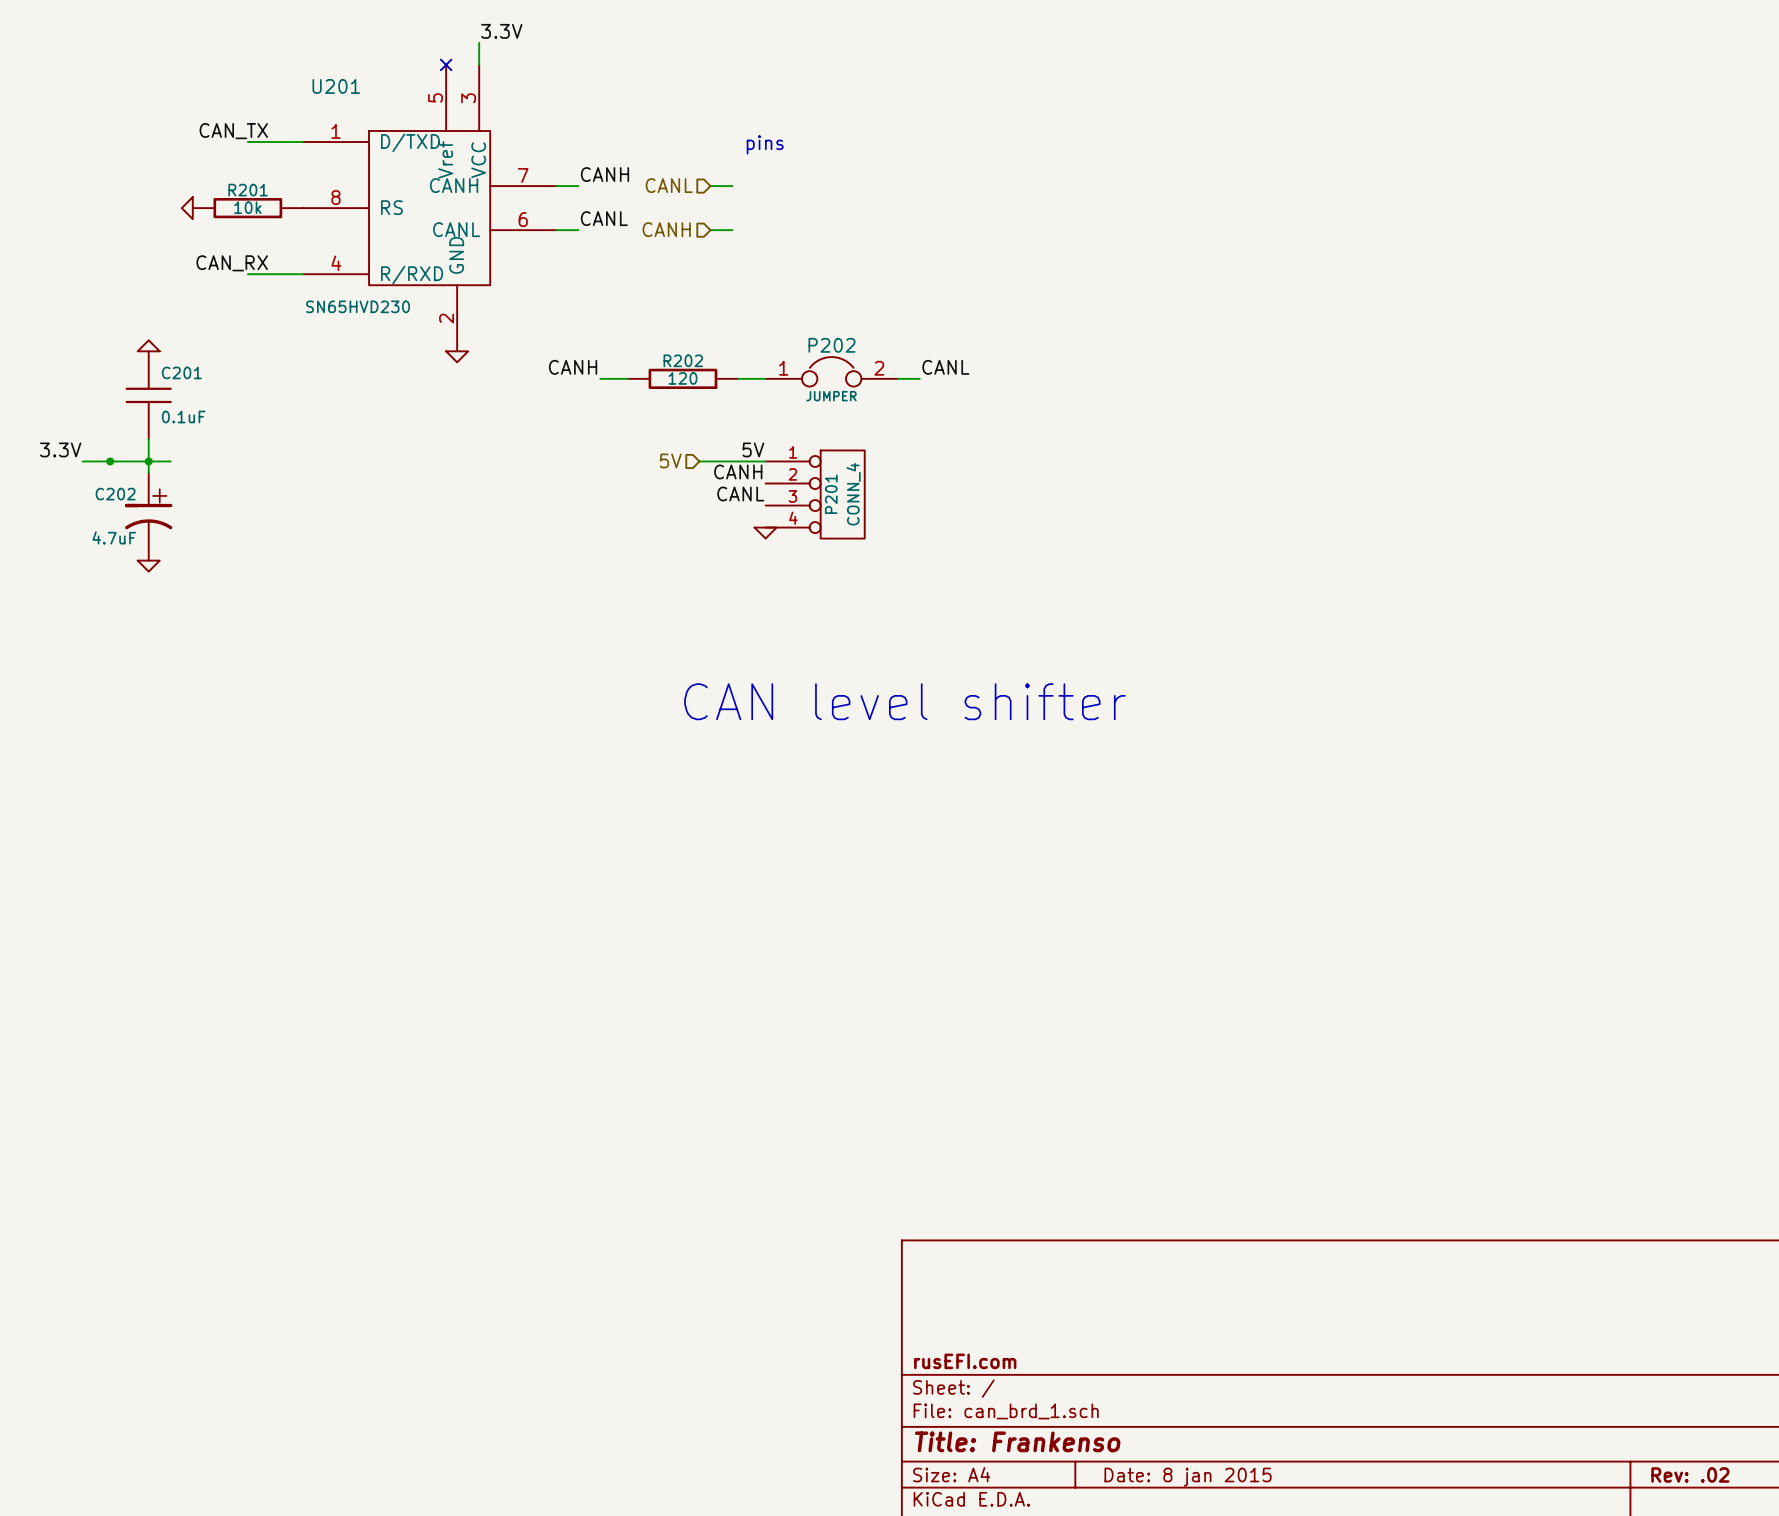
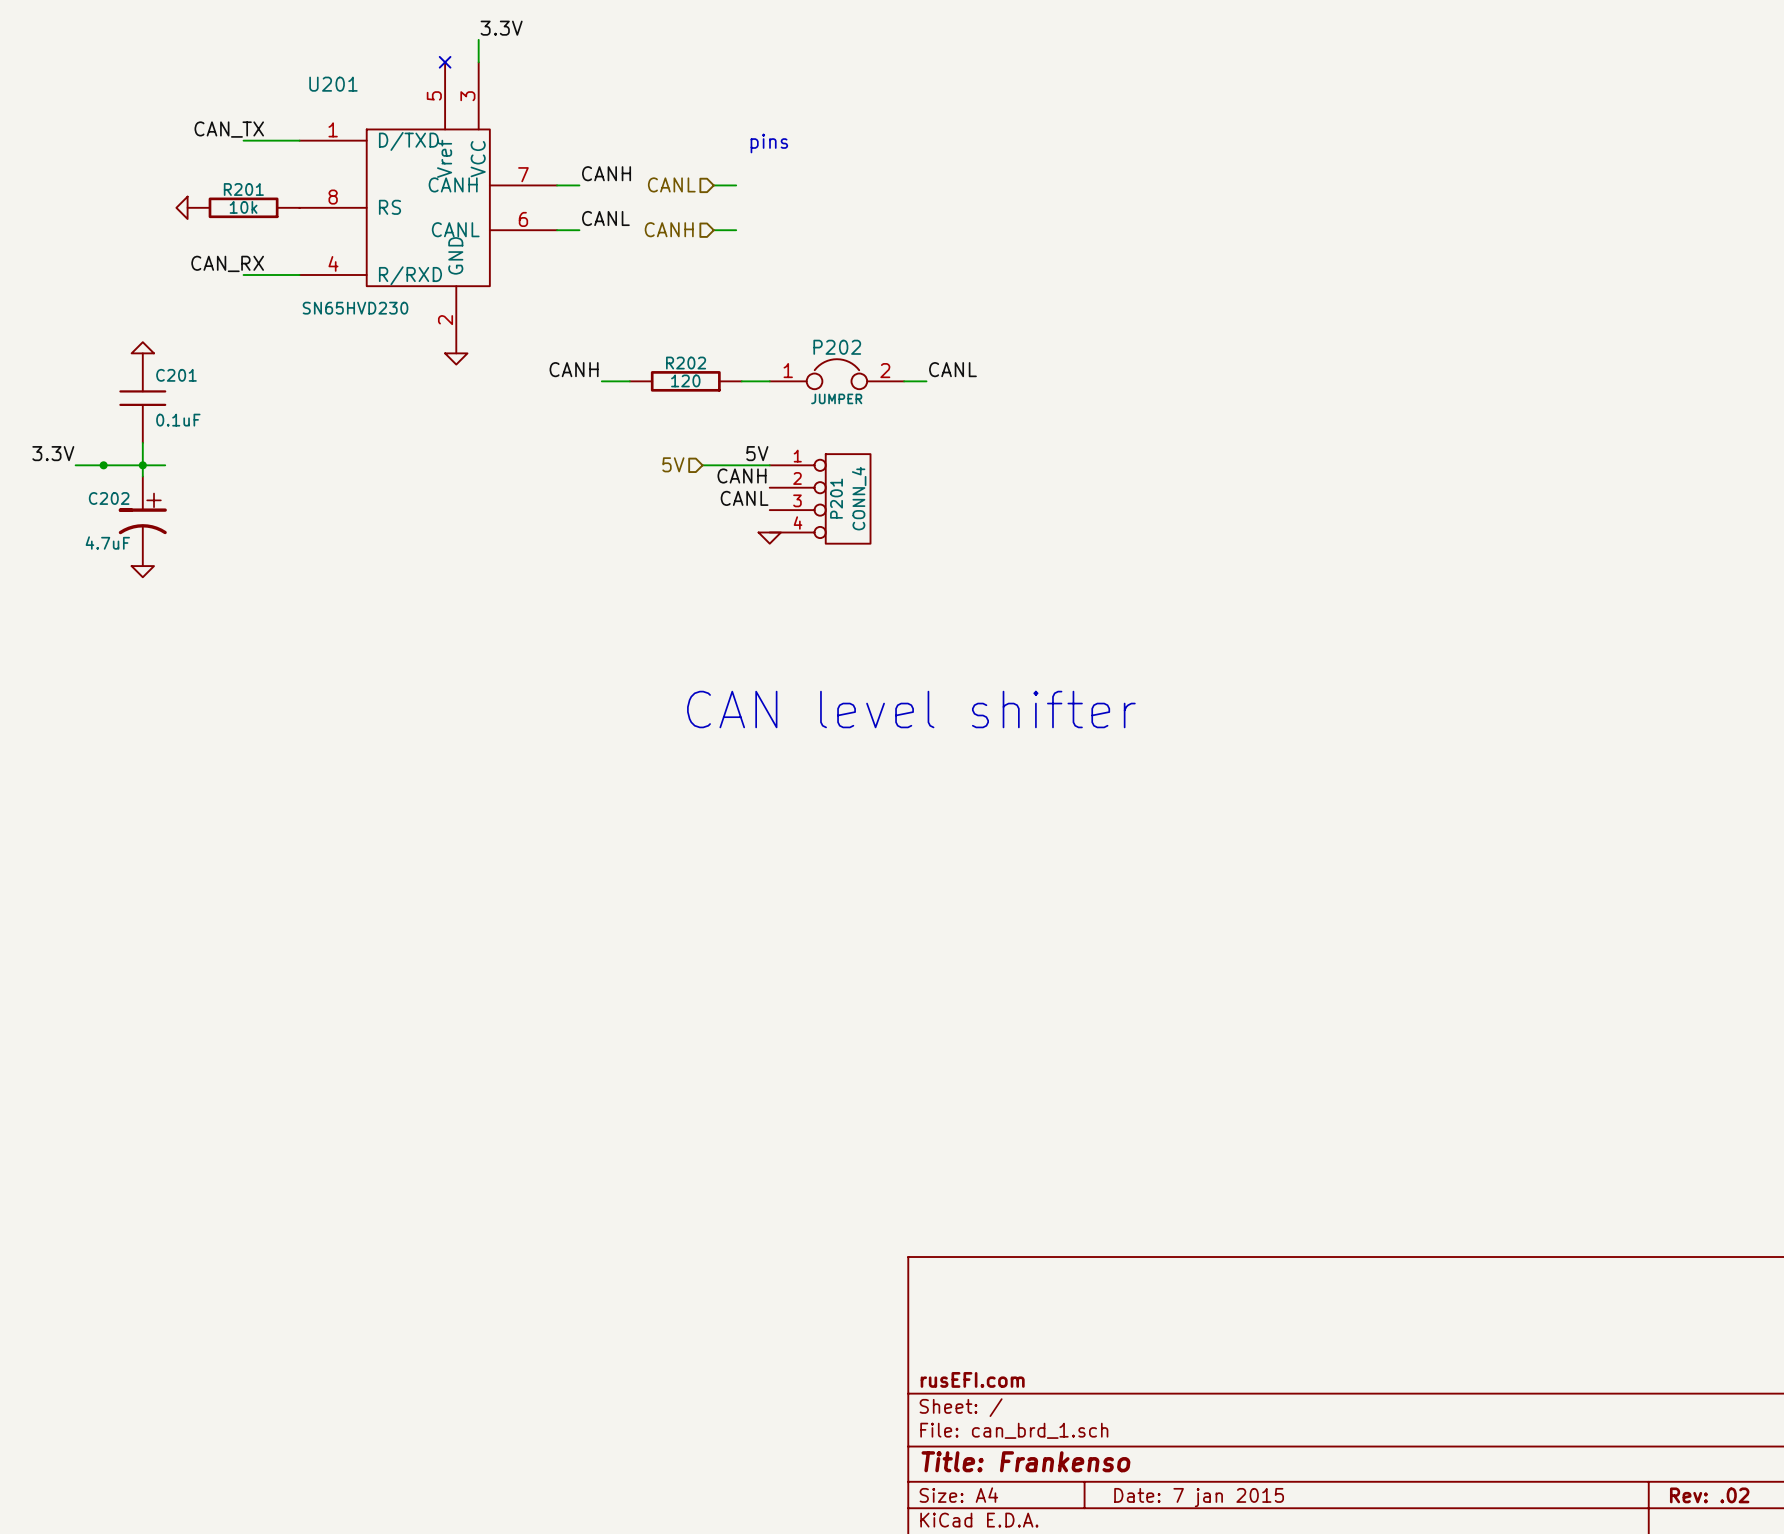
title block: Date: 8 jan 2015 (1188, 1477) -> Date: 7 jan 2015 (1199, 1497)

